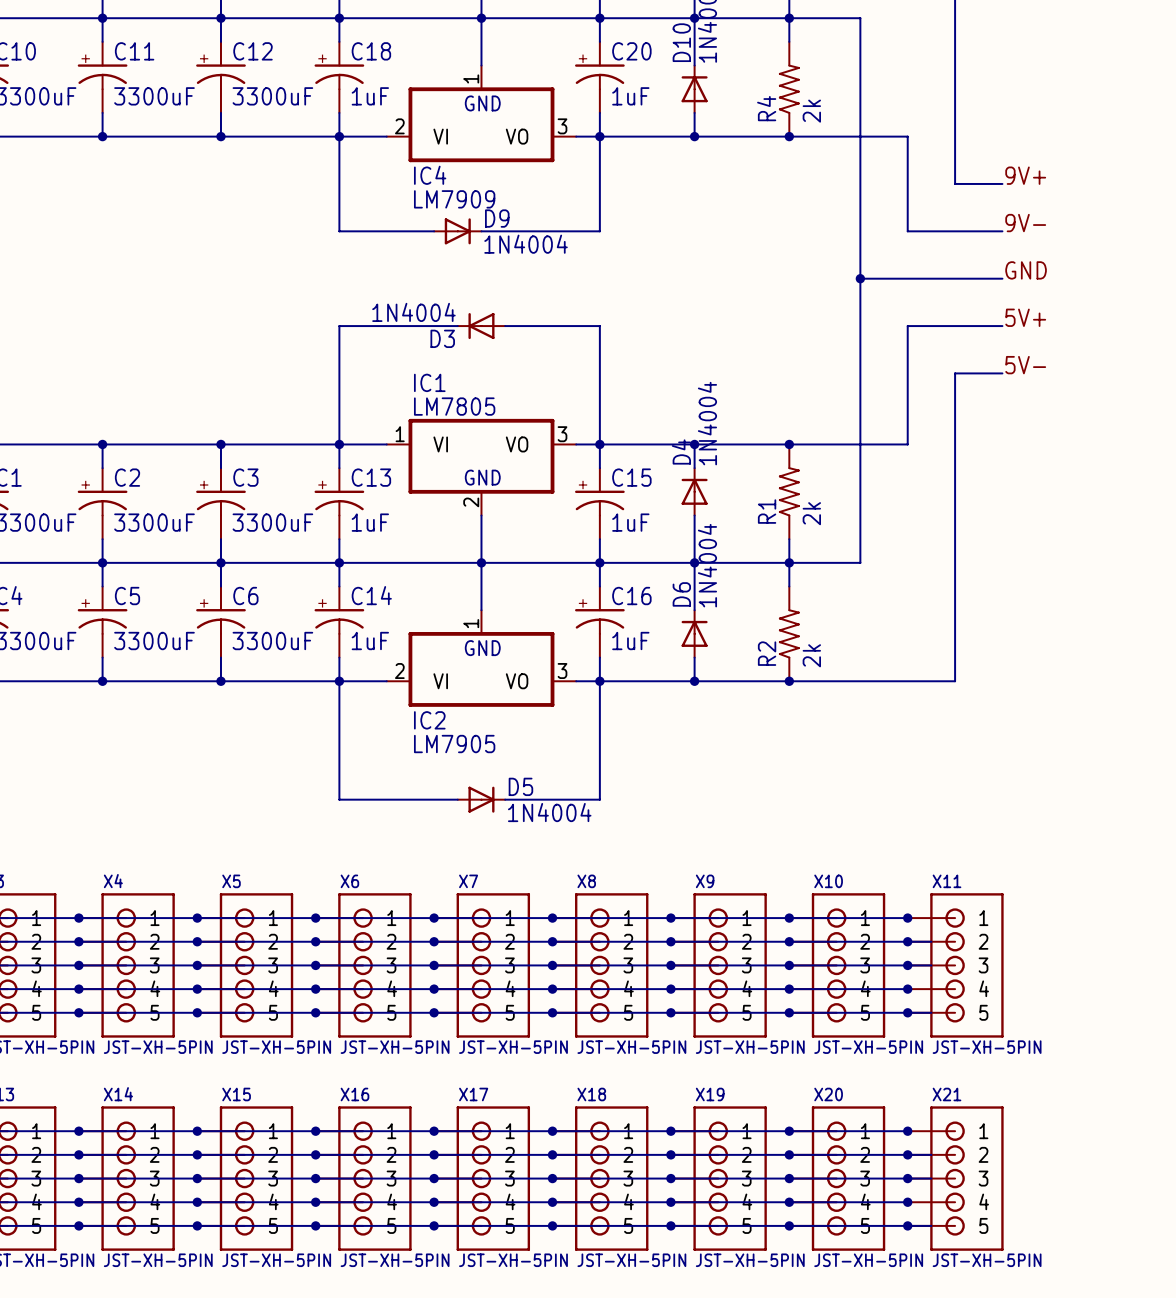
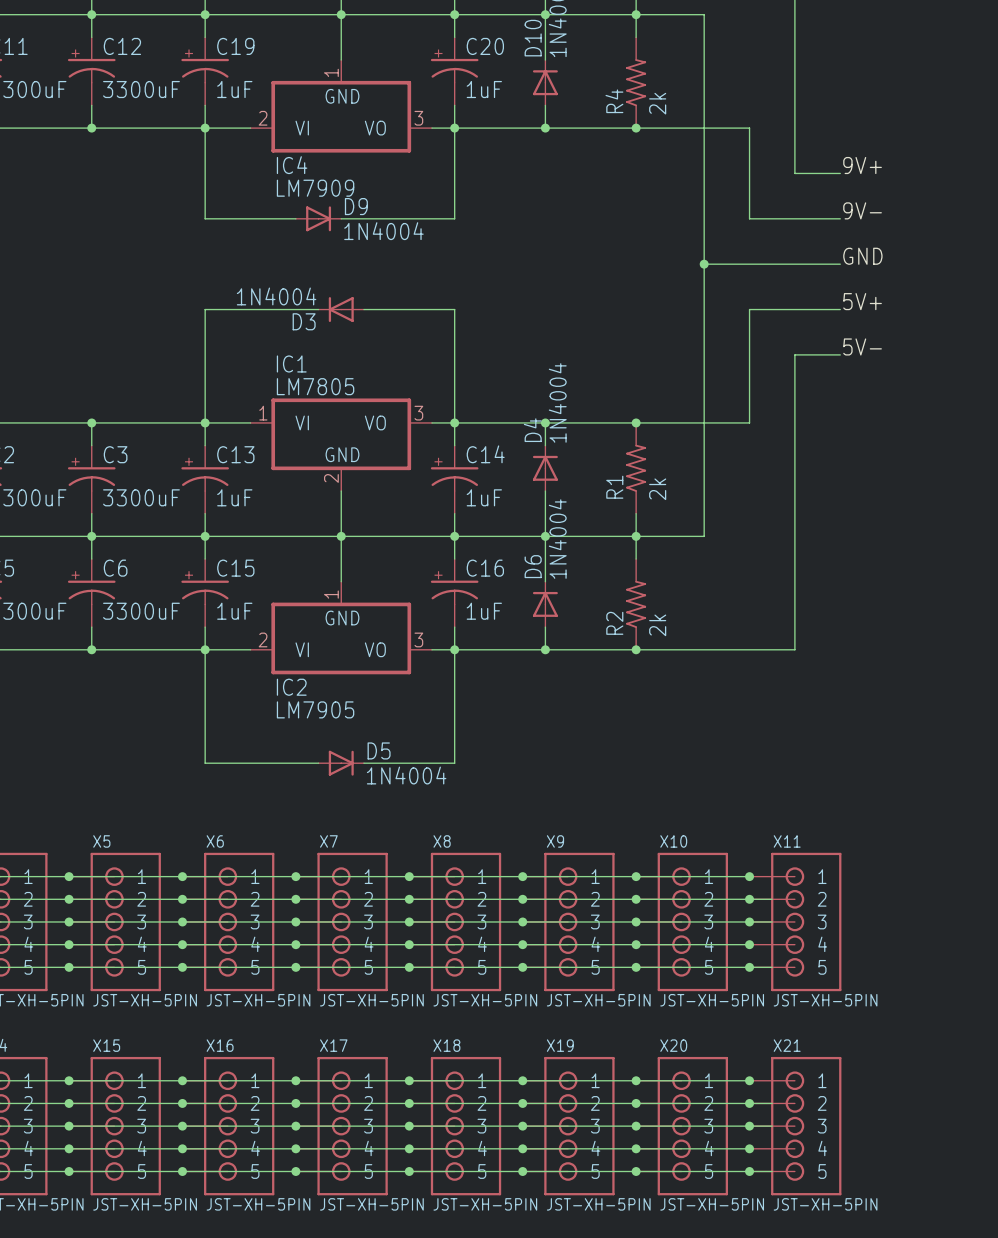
C18 name: C18 (371, 51) -> C19 (235, 46)
C15 name: C15 (631, 477) -> C14 (485, 454)
C14 name: C14 (371, 595) -> C15 (235, 568)

